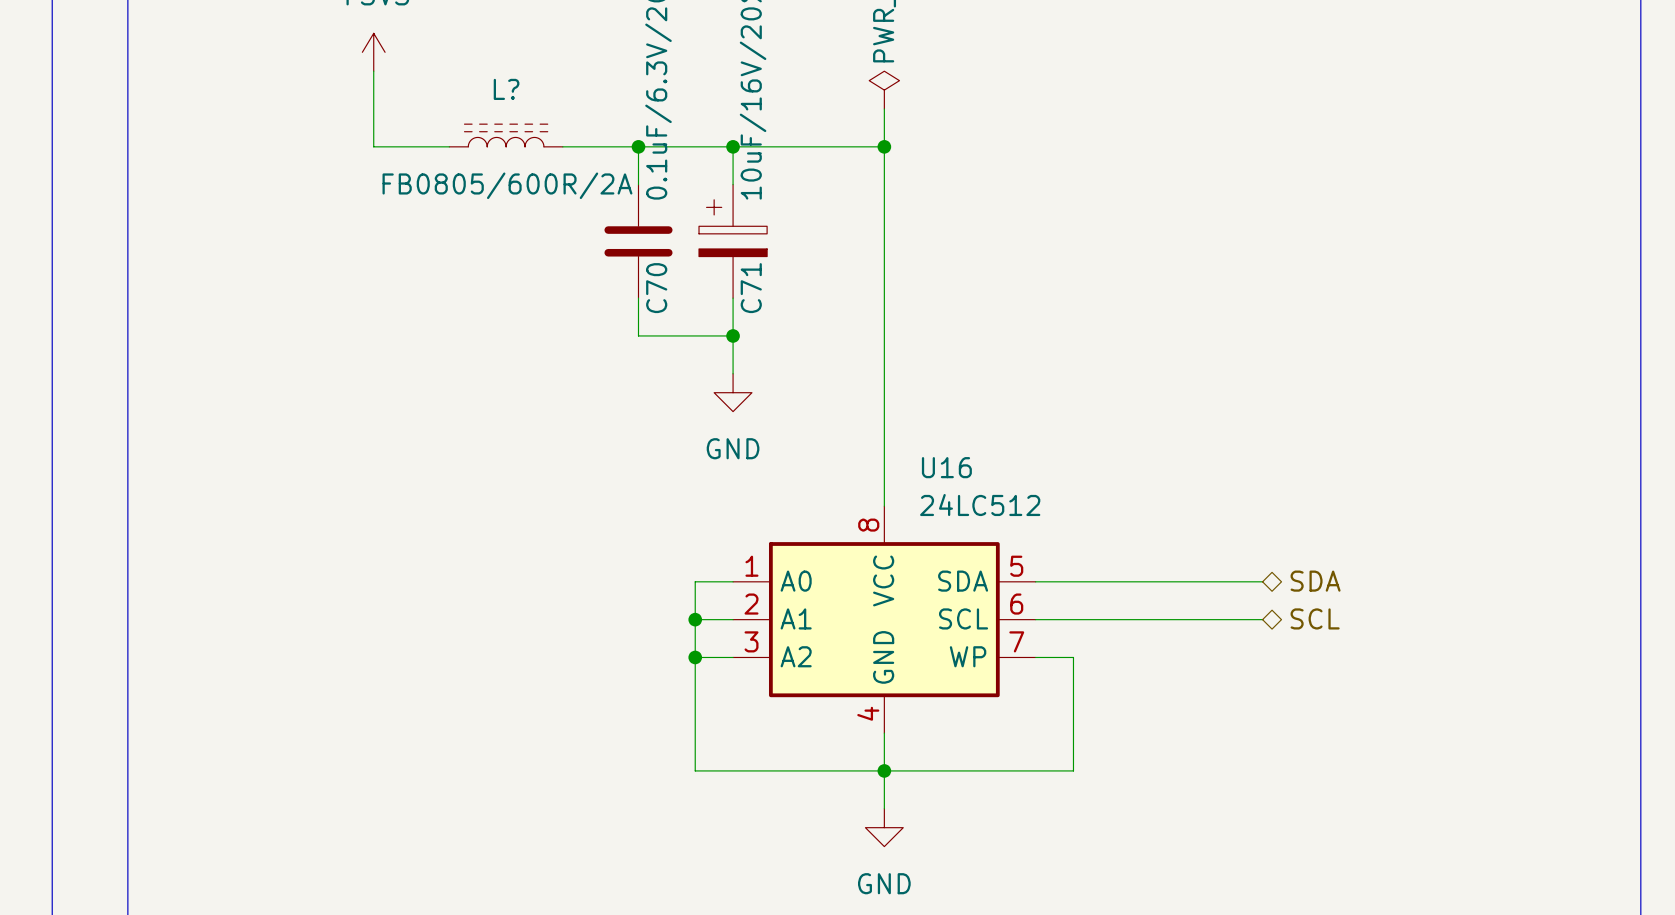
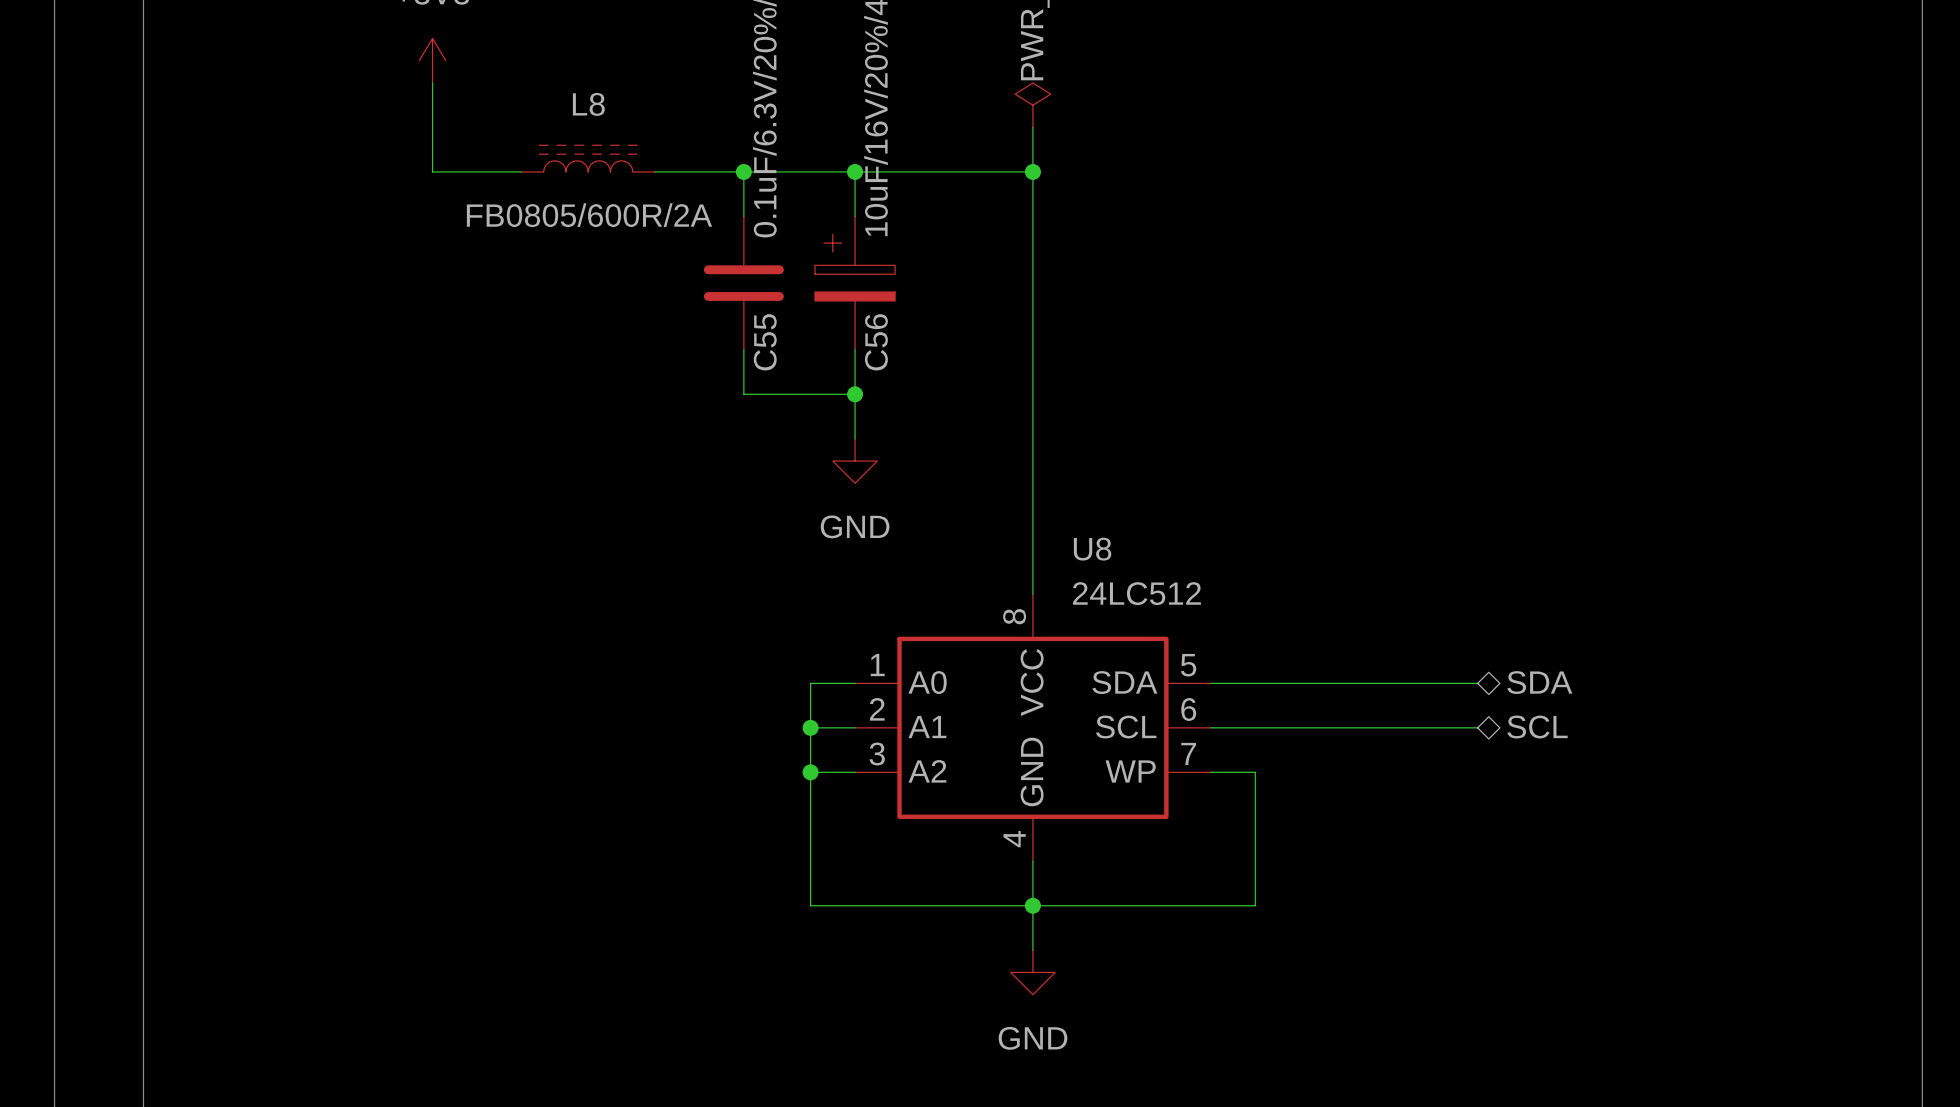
L? name: L? (506, 89) -> L8 (588, 104)
C70 name: C70 (656, 288) -> C55 (765, 342)
C71 name: C71 (751, 288) -> C56 (876, 342)
U16 name: U16 (946, 467) -> U8 (1092, 549)

